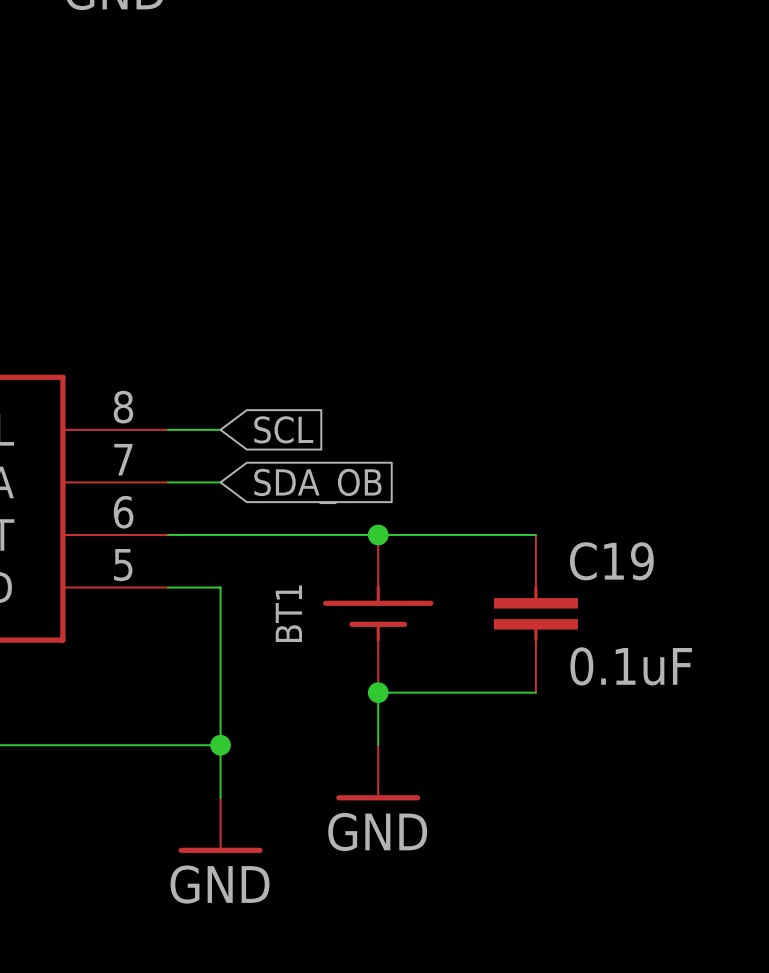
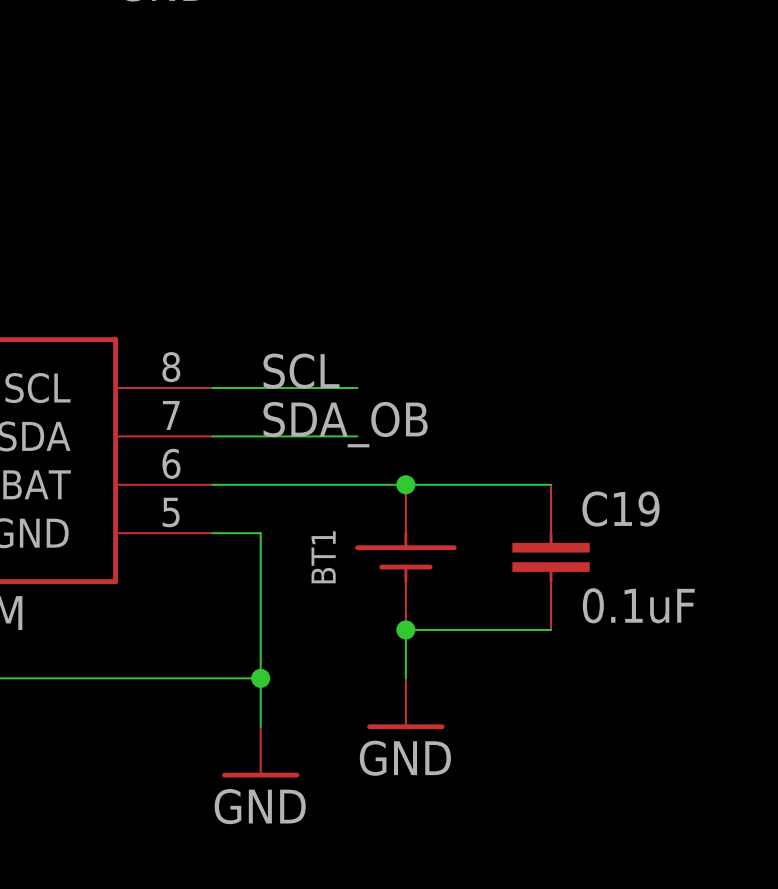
label: none -> SCL (301, 371)
wire: none -> (260, 388) (357, 388)
global label: SCL (283, 429) -> none
label: none -> SDA_OB (345, 424)
wire: none -> (260, 436) (357, 436)
global label: SDA_OB (317, 486) -> none

